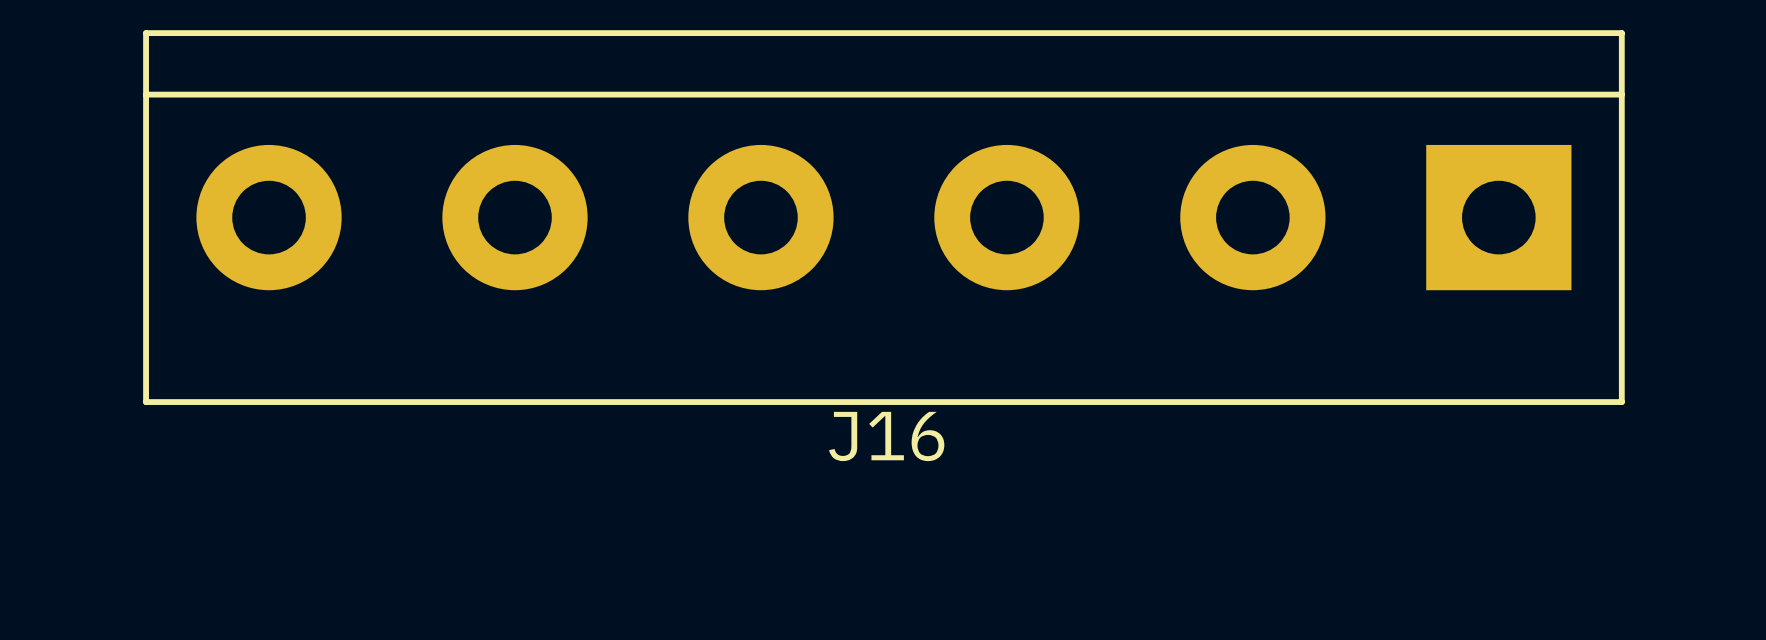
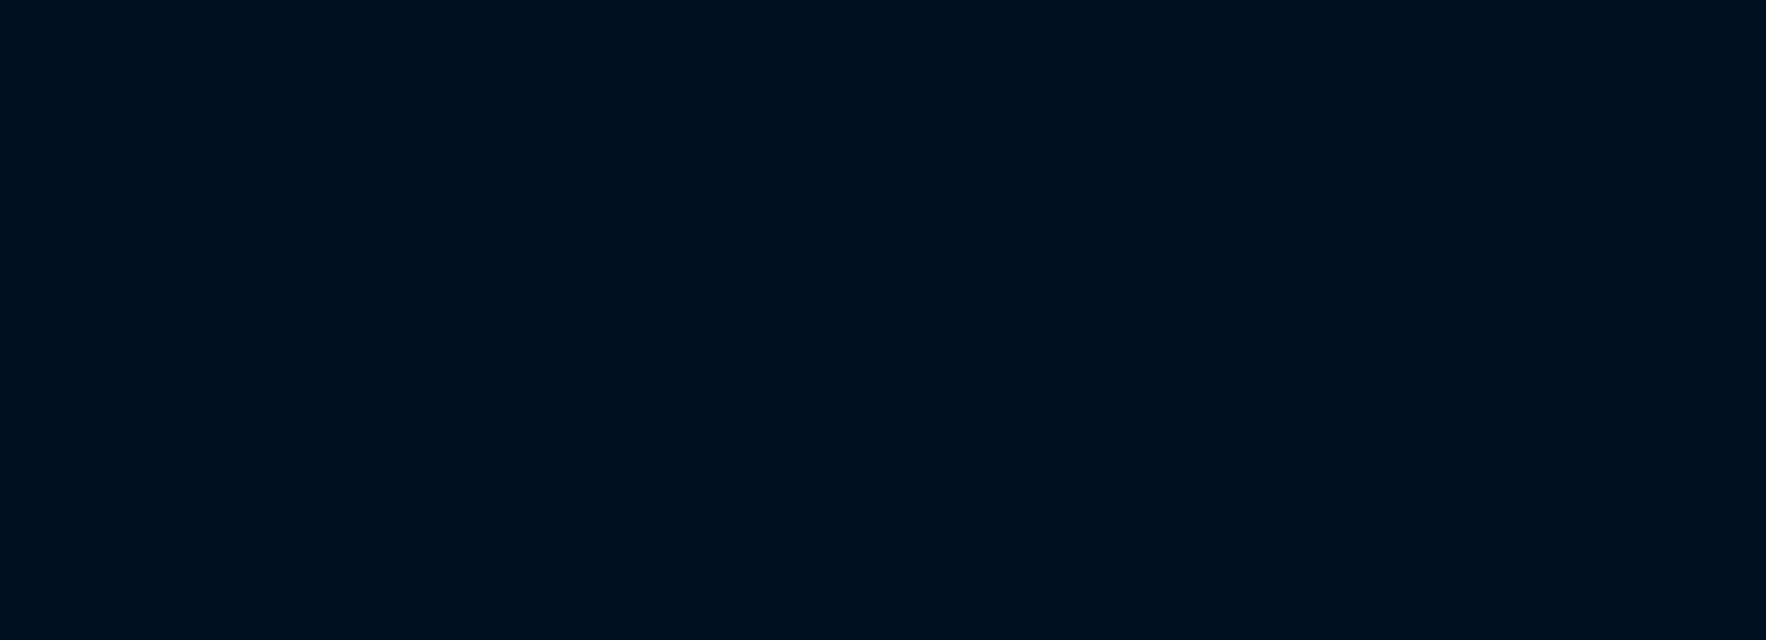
J16: (883, 217) -> none

